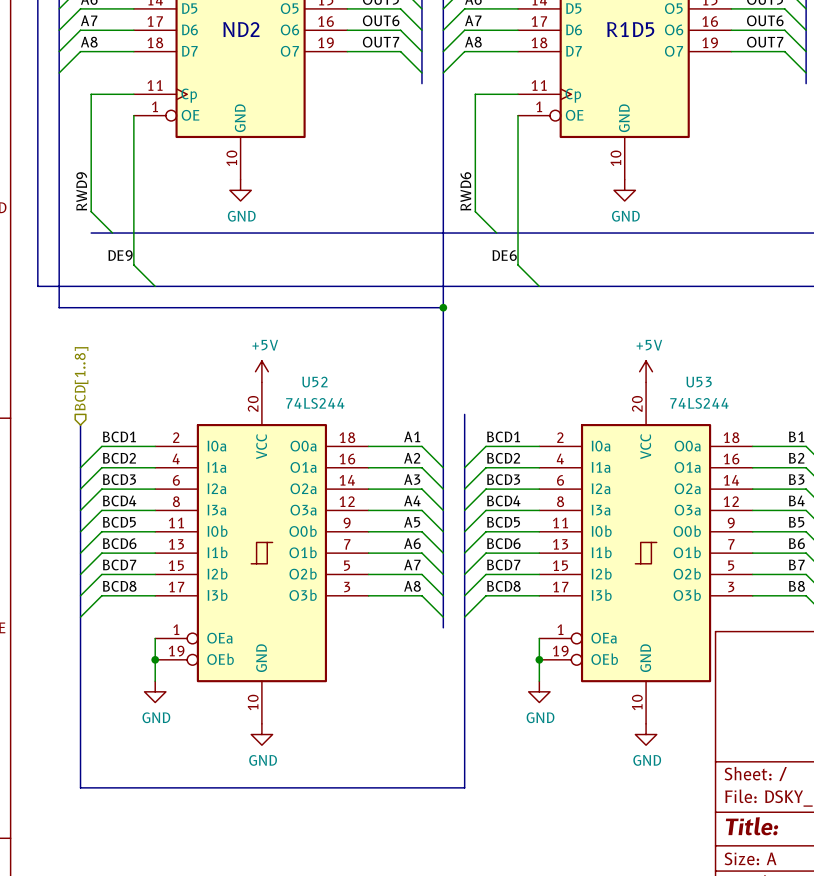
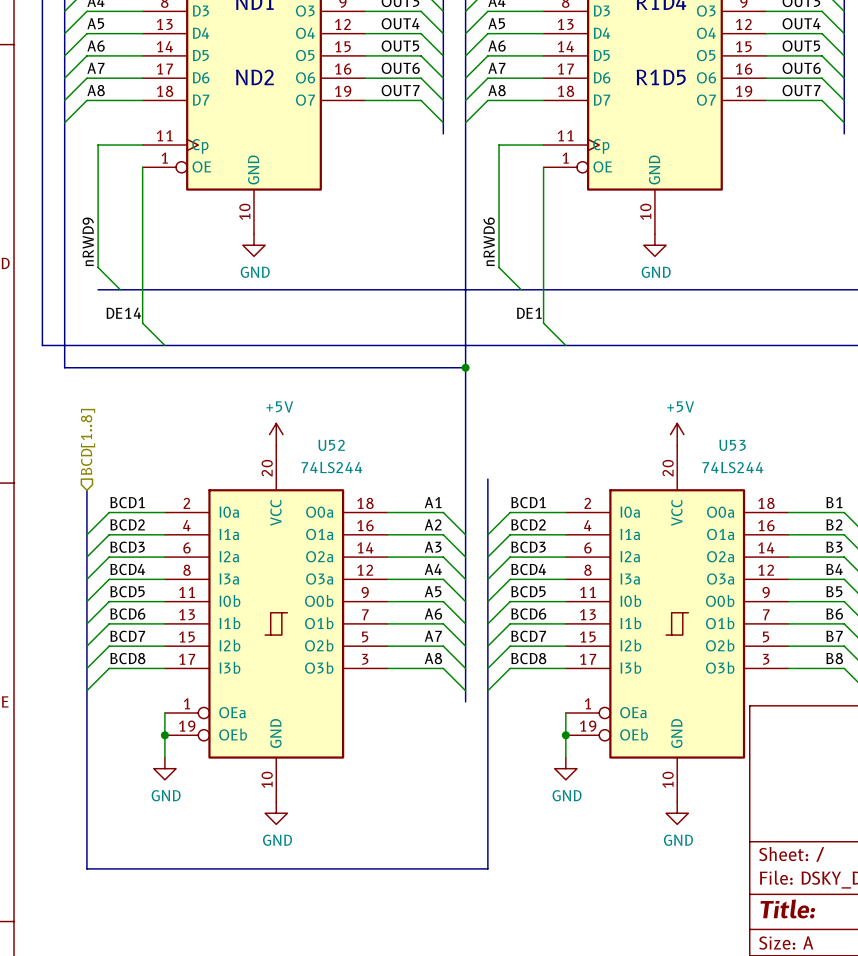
label: RWD9 (81, 191) -> nRWD9 (88, 241)
label: RWD6 (465, 191) -> nRWD6 (489, 241)
label: DE9 (120, 255) -> DE14 (123, 313)
label: DE6 (504, 255) -> DE1 (529, 313)

